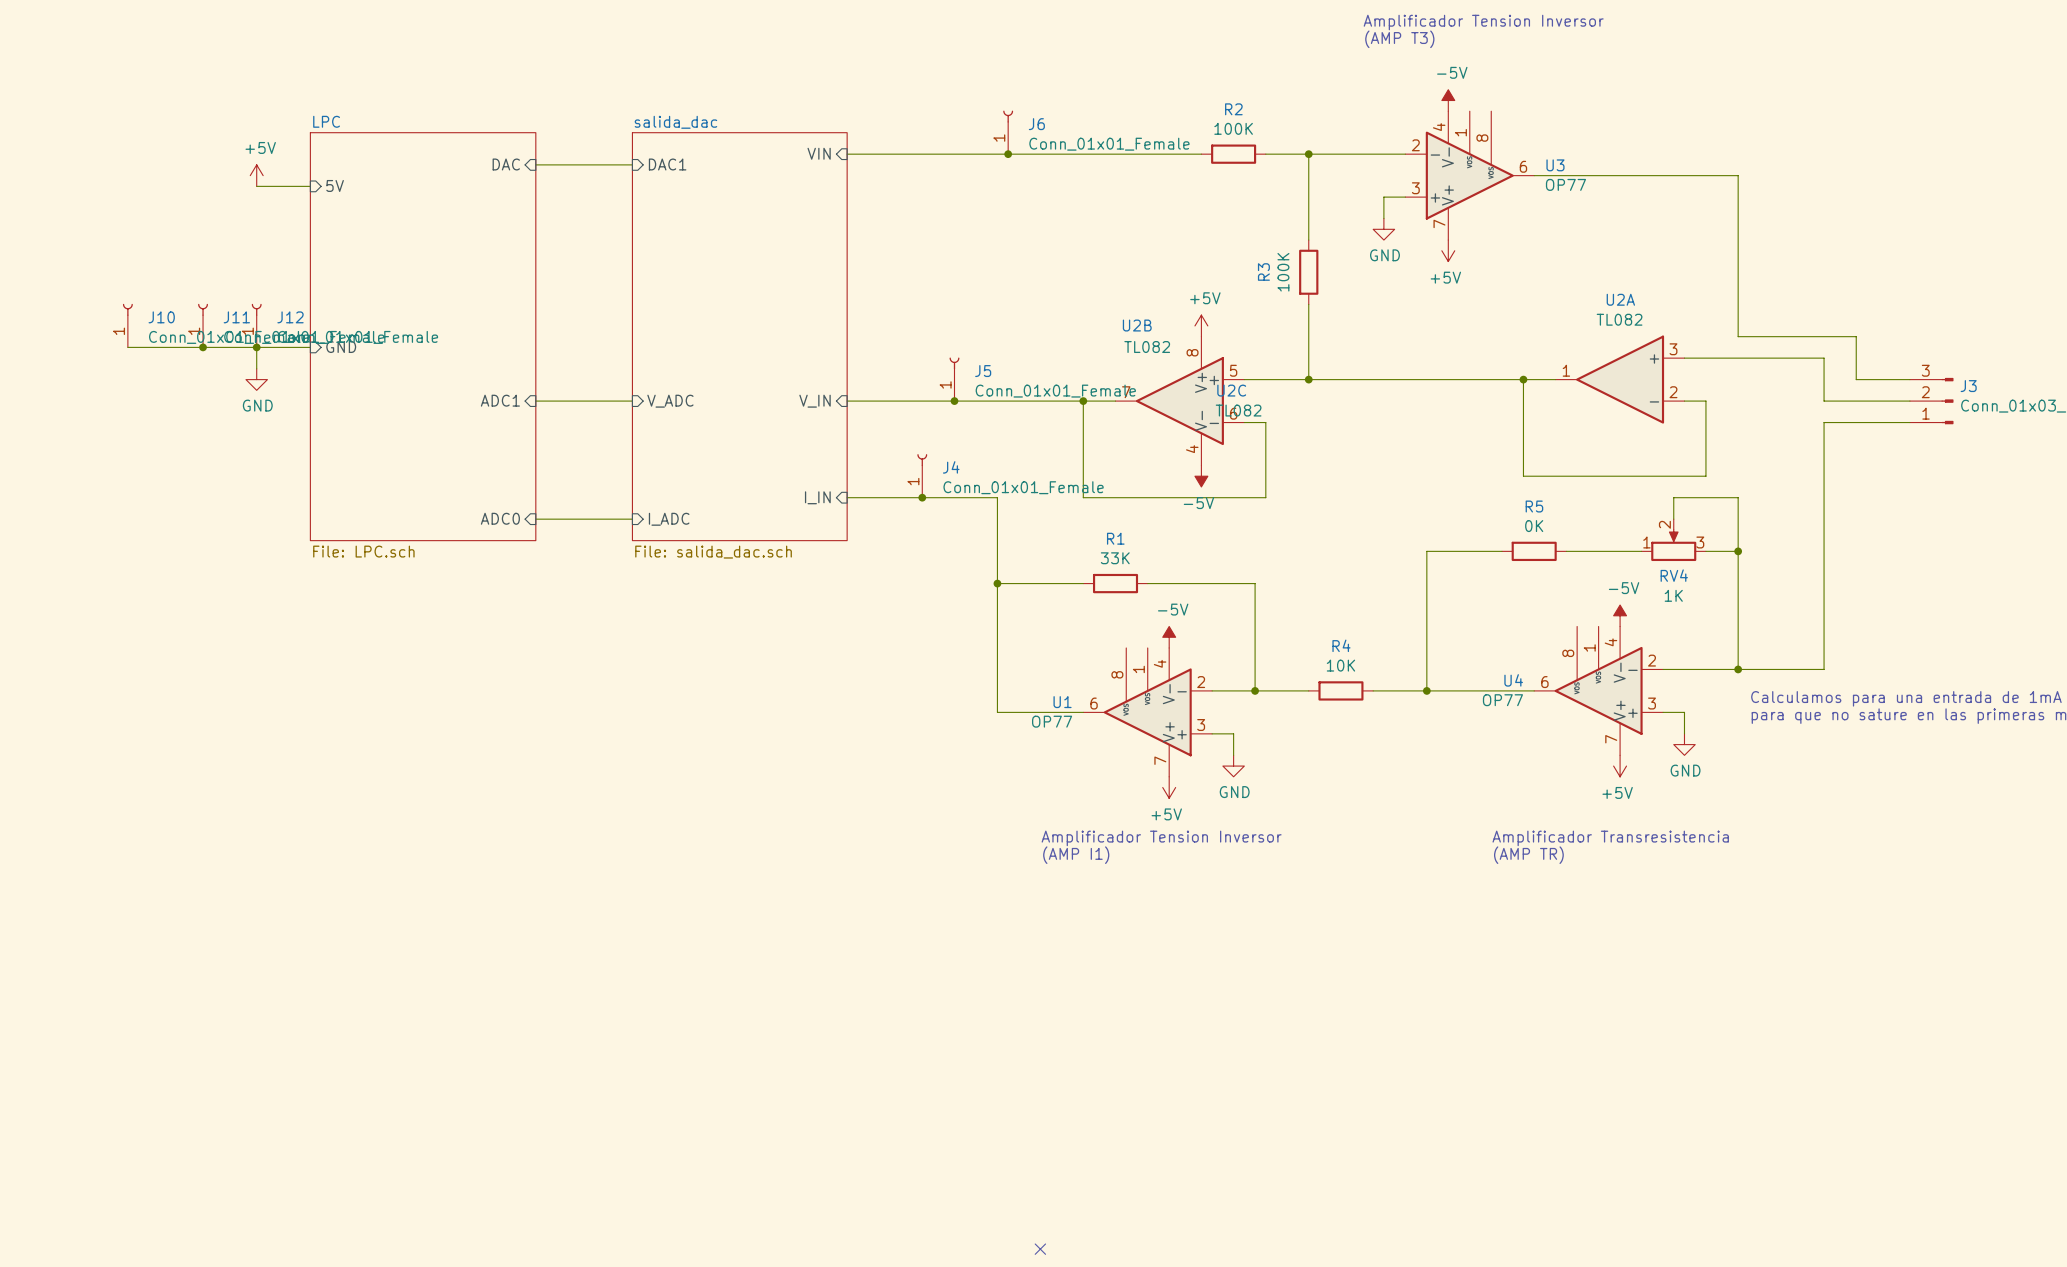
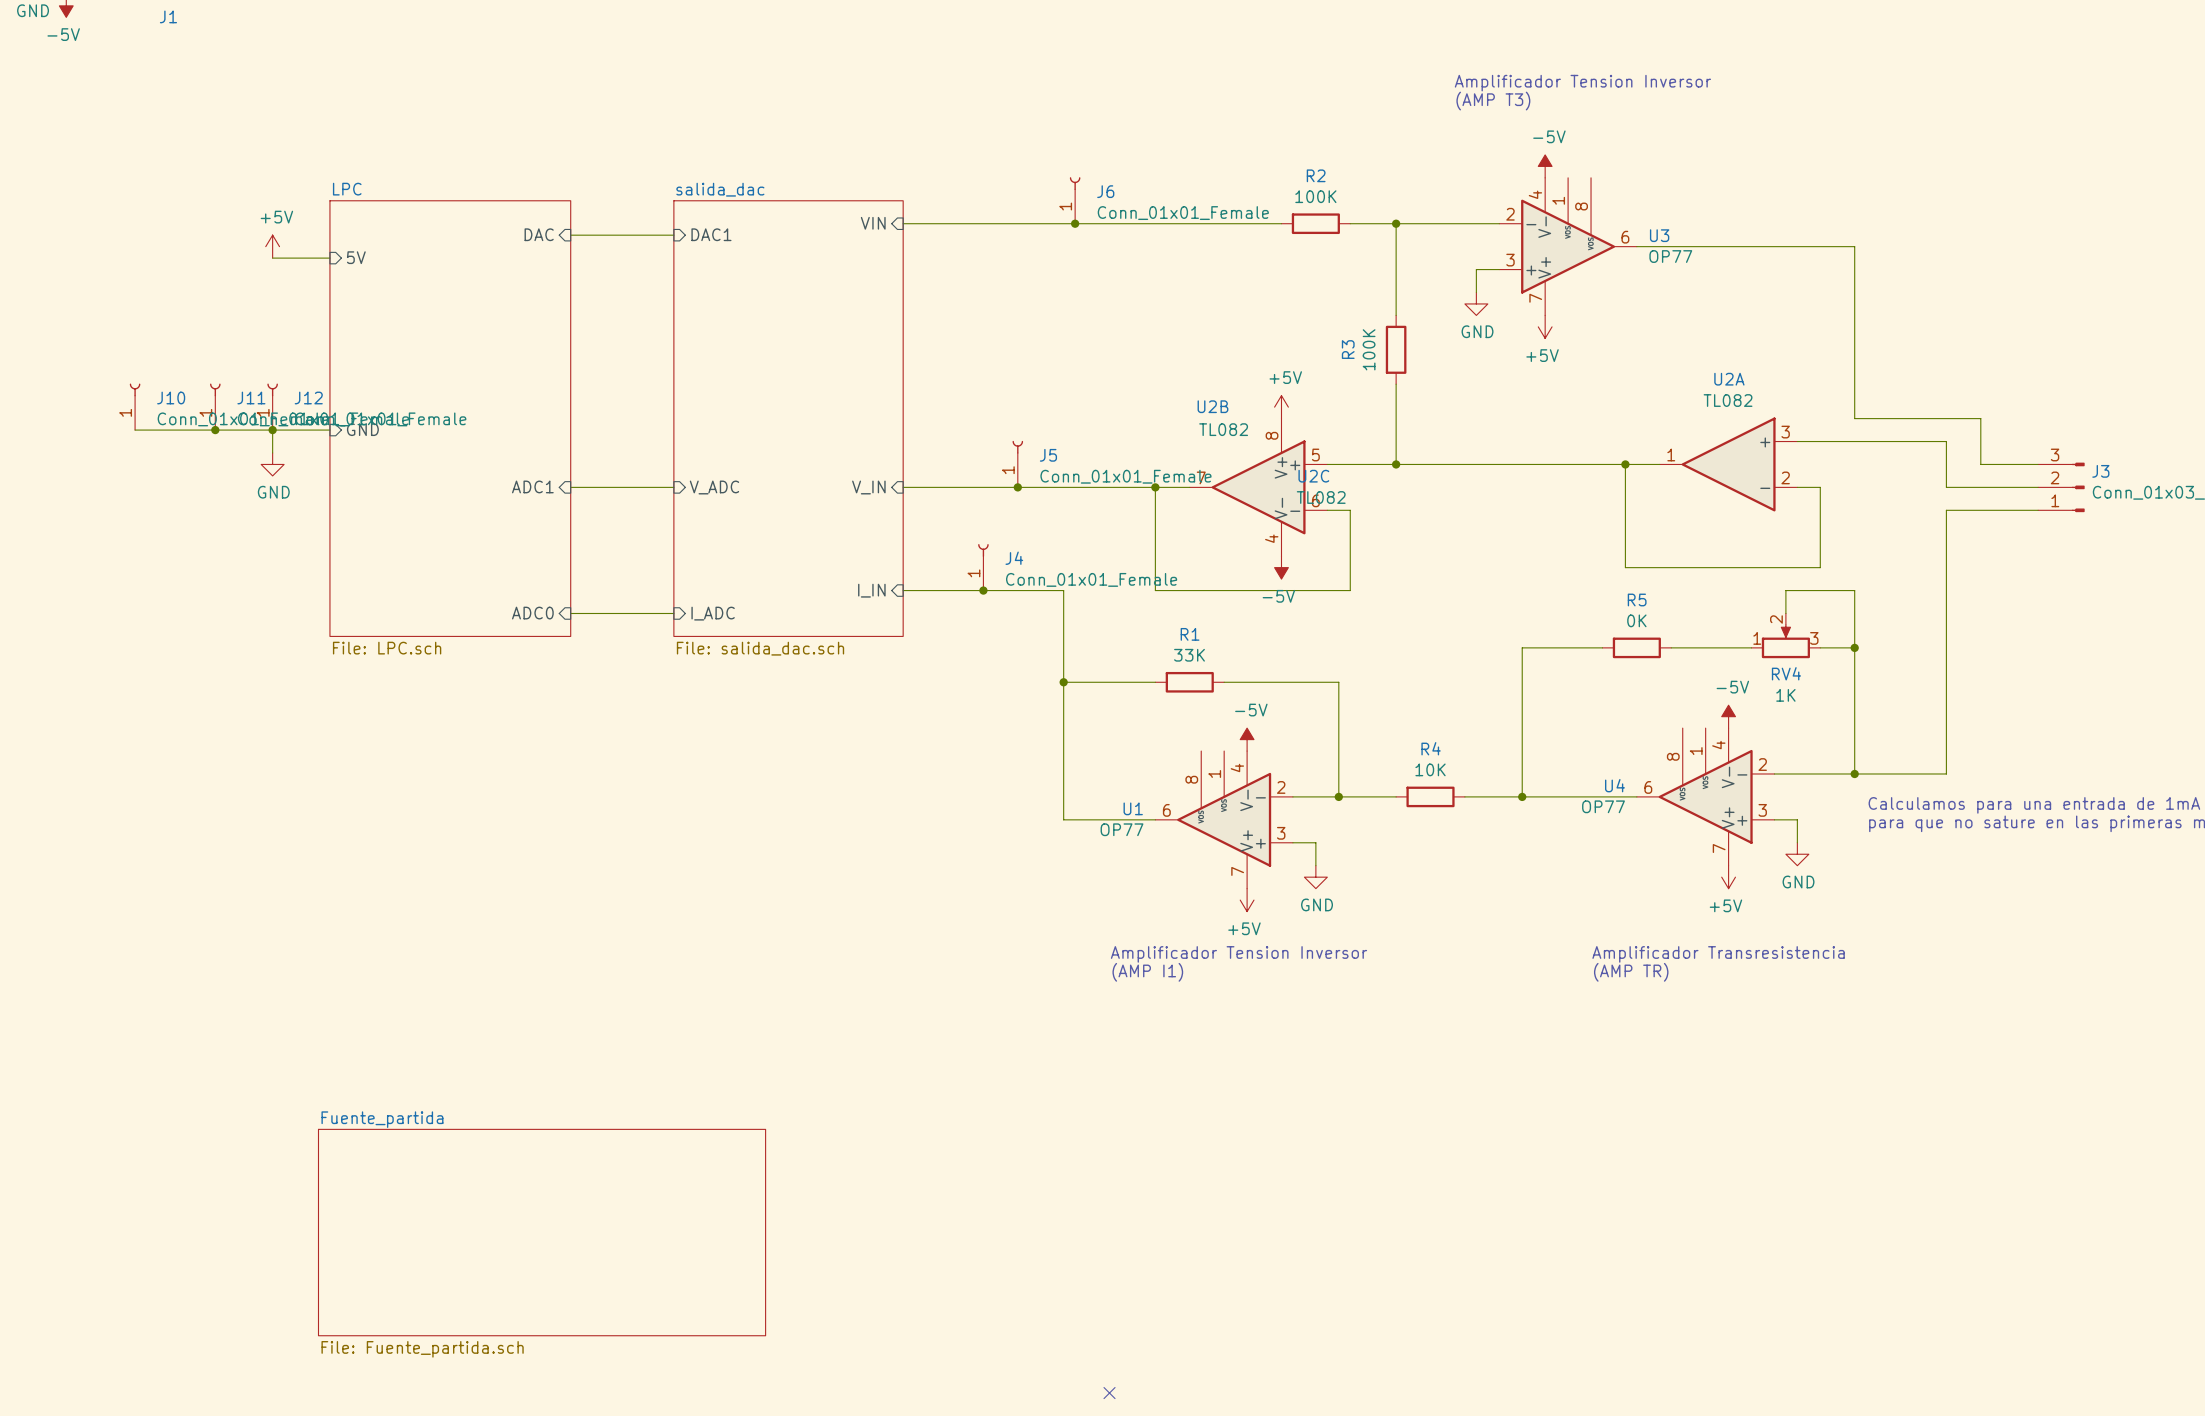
sheet Fuente_partida: none -> File: Fuente_partida.sch (542, 1232)

